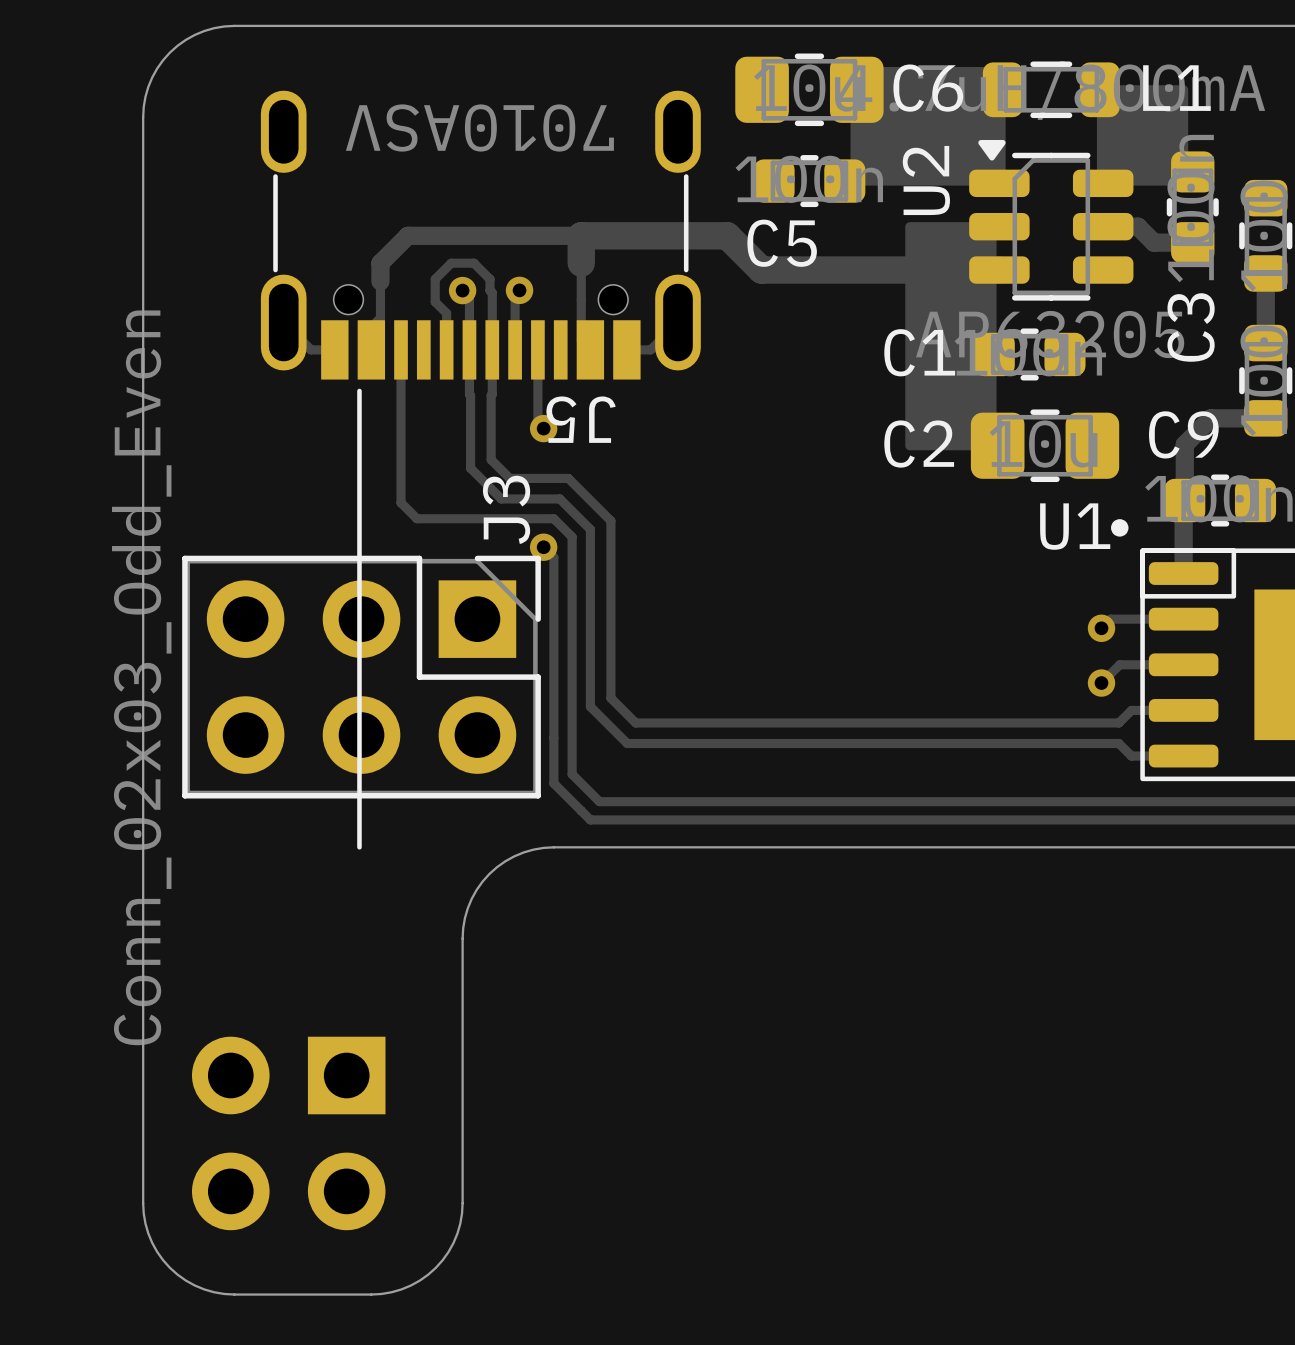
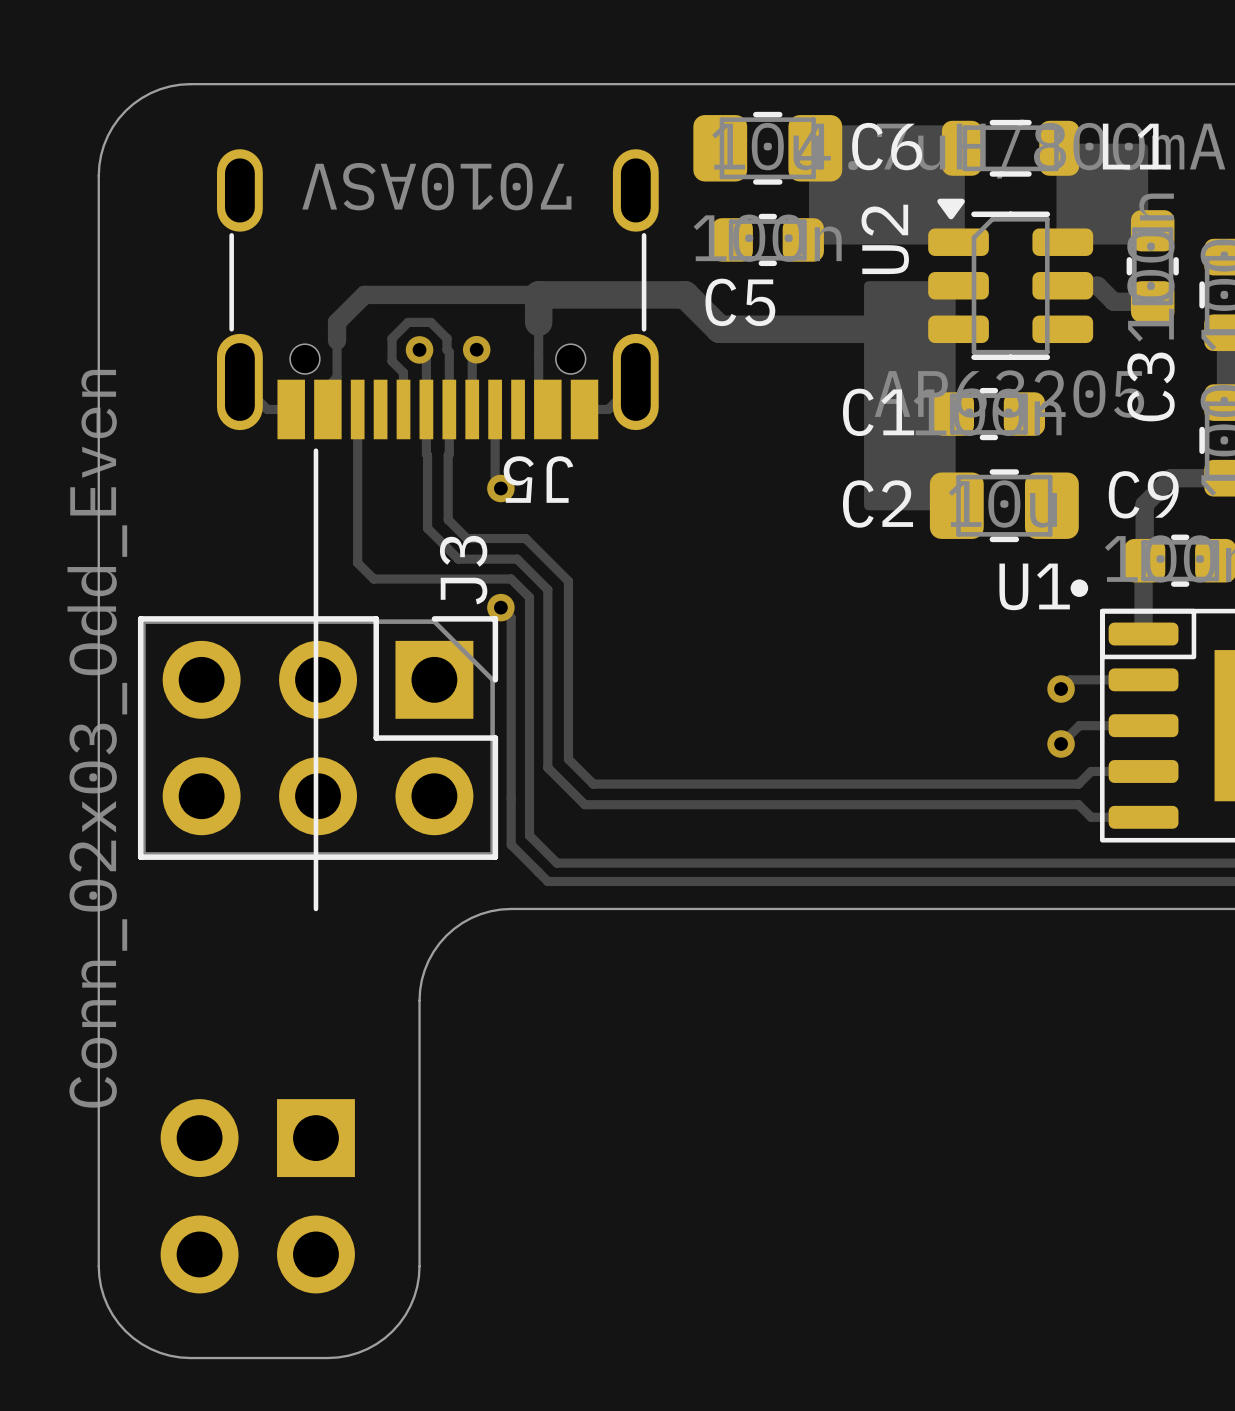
part position: (288, 1133) -> (257, 1196)

